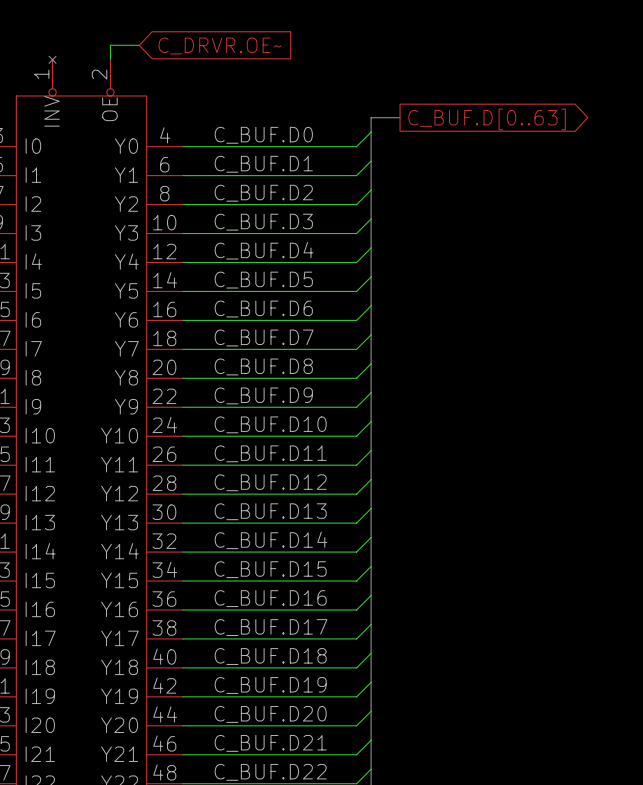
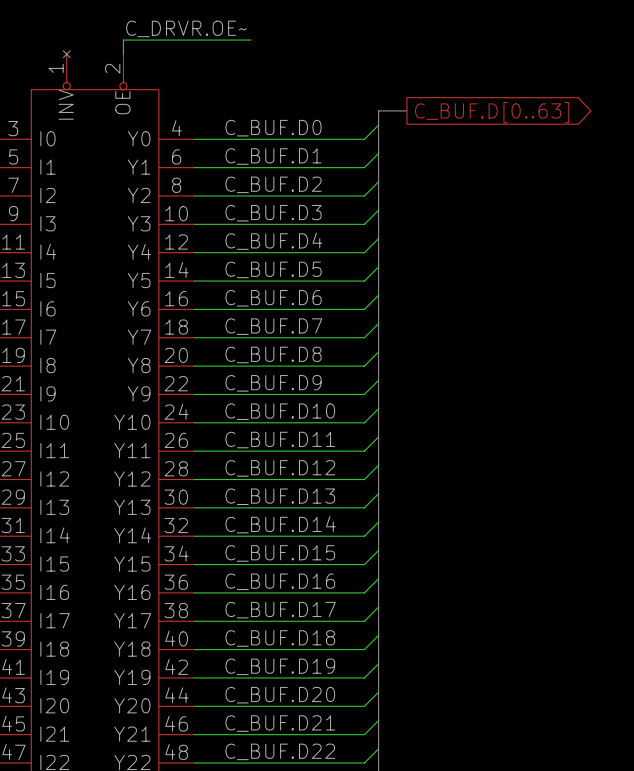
label: none -> C_DRVR.OE~ (186, 28)
wire: none -> (151, 40) (251, 40)
global label: C_DRVR.OE~ (220, 45) -> none

